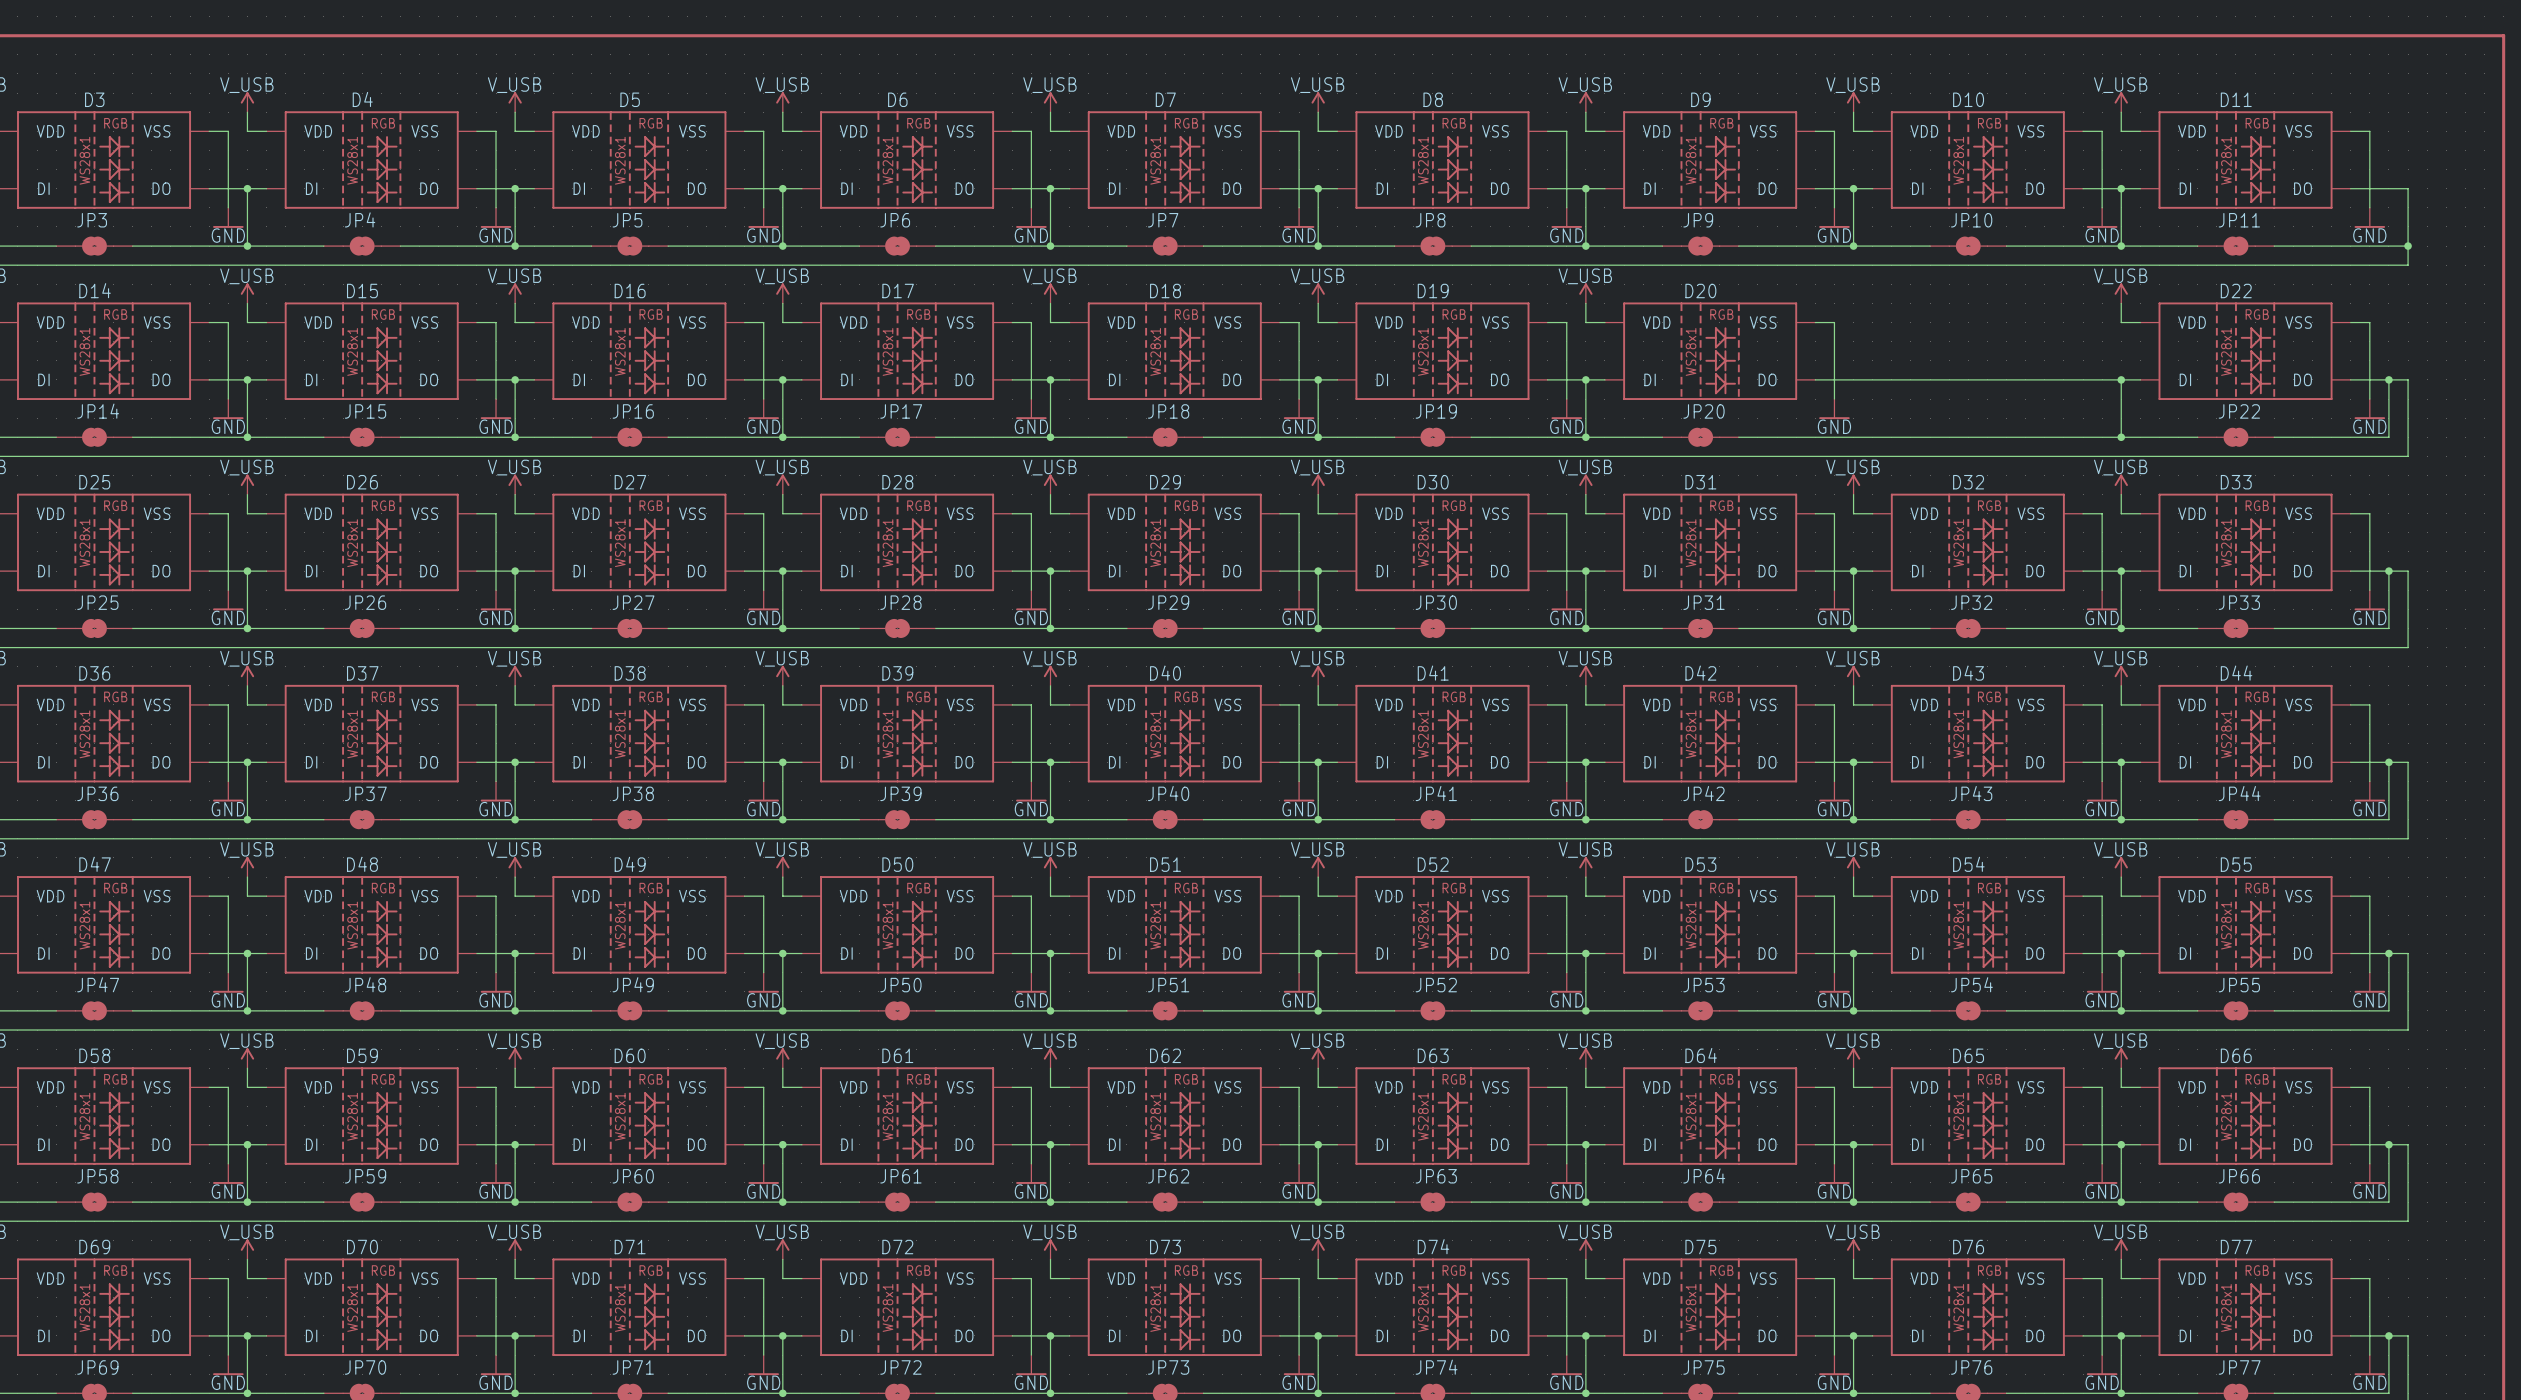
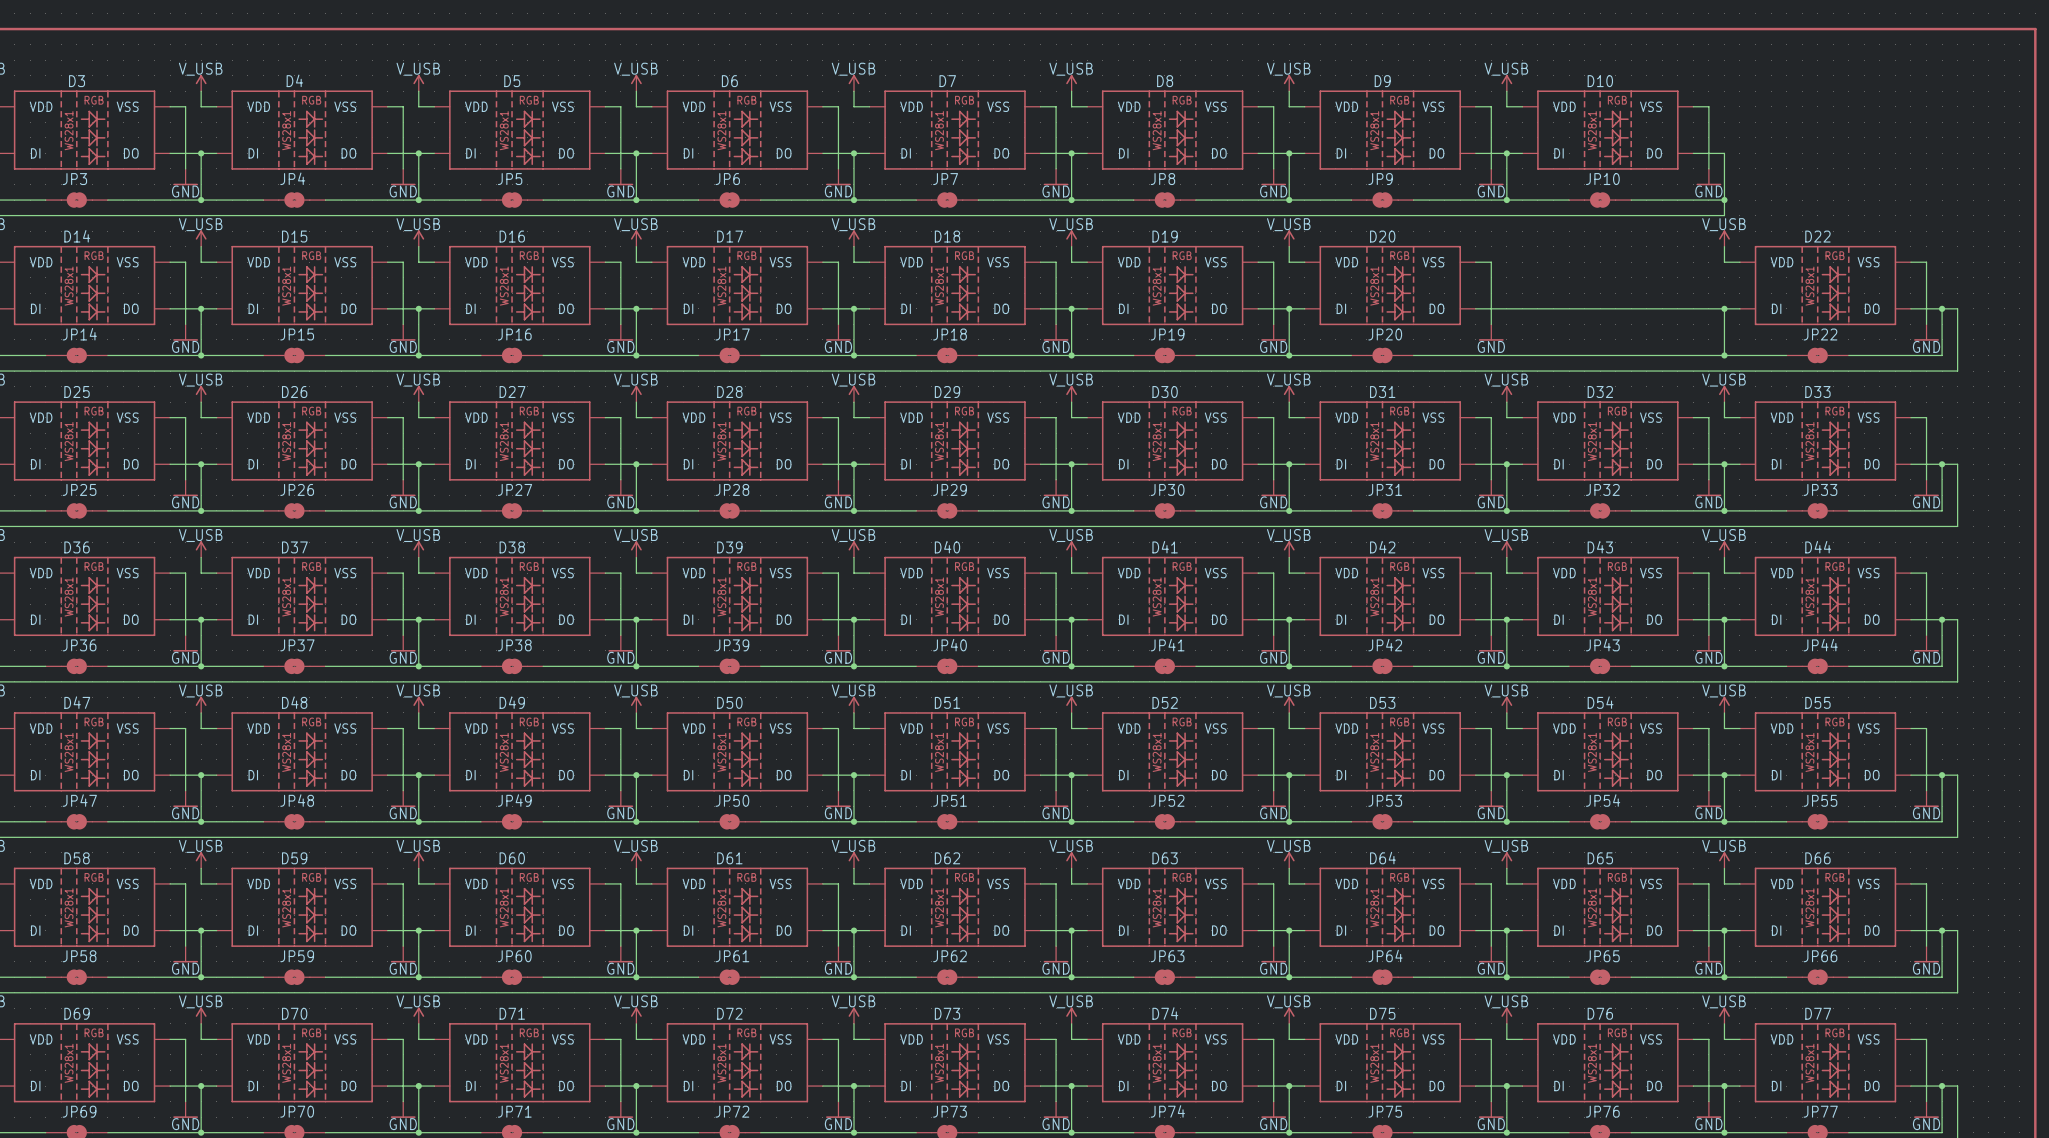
power symbol: V_USB (2121, 102) -> none
wire: (2121, 112) (2121, 131) (2140, 131) -> none
wire: (2350, 131) (2369, 131) (2369, 207) -> none
D11: (2245, 160) -> none
wire: (2121, 188) (2140, 188) -> none
junction: (2121, 188) -> none
wire: (2350, 188) (2408, 188) (2408, 265) (2121, 265) -> none
power symbol: GND (2369, 217) -> none
wire: (2121, 246) (2197, 246) -> (1724, 200) (1724, 215)
JP11: (2235, 246) -> none
wire: (2274, 246) (2408, 246) -> none
junction: (2408, 246) -> none

